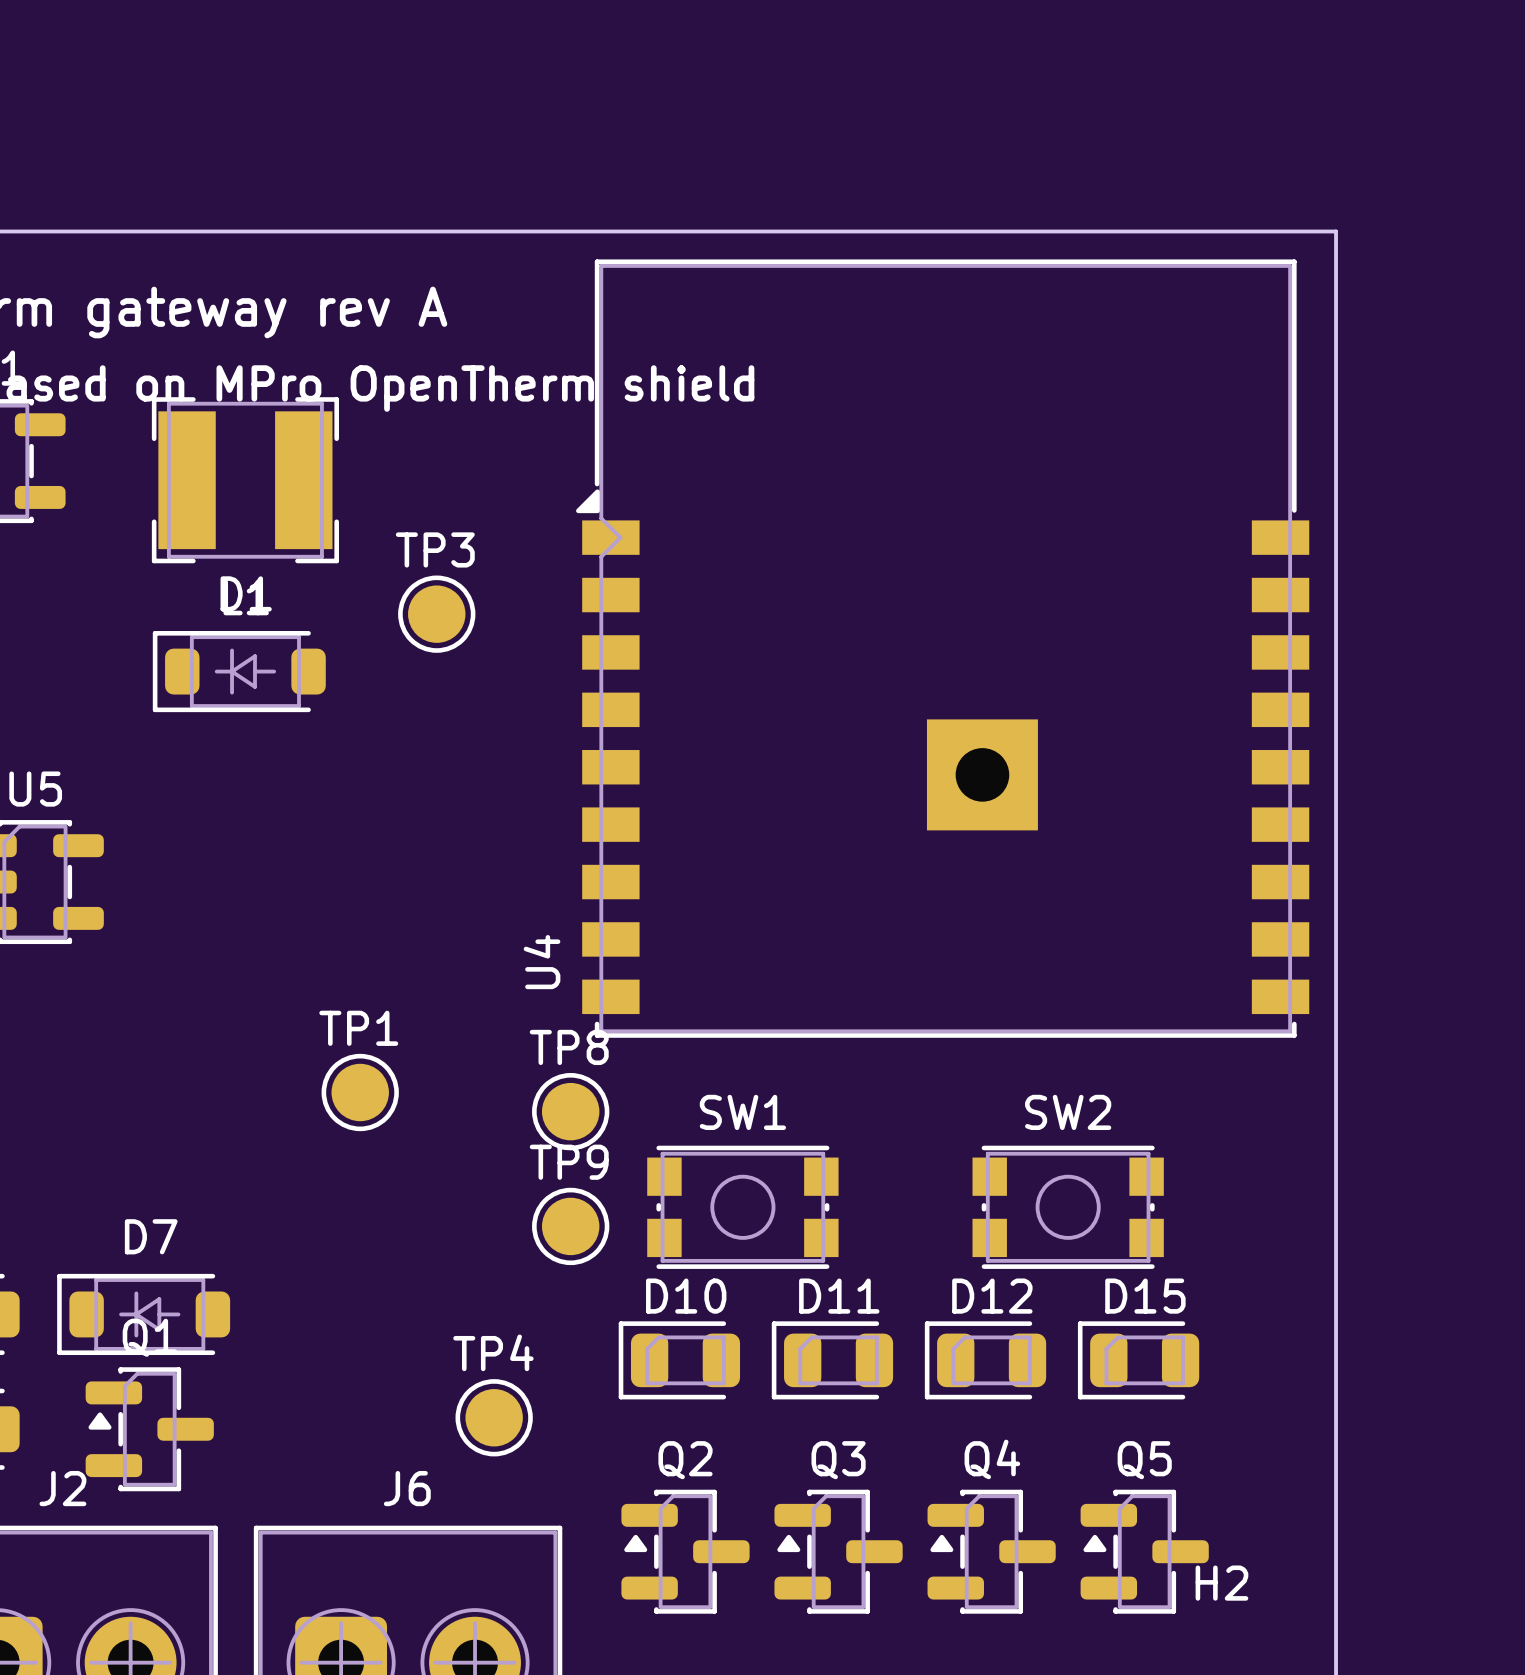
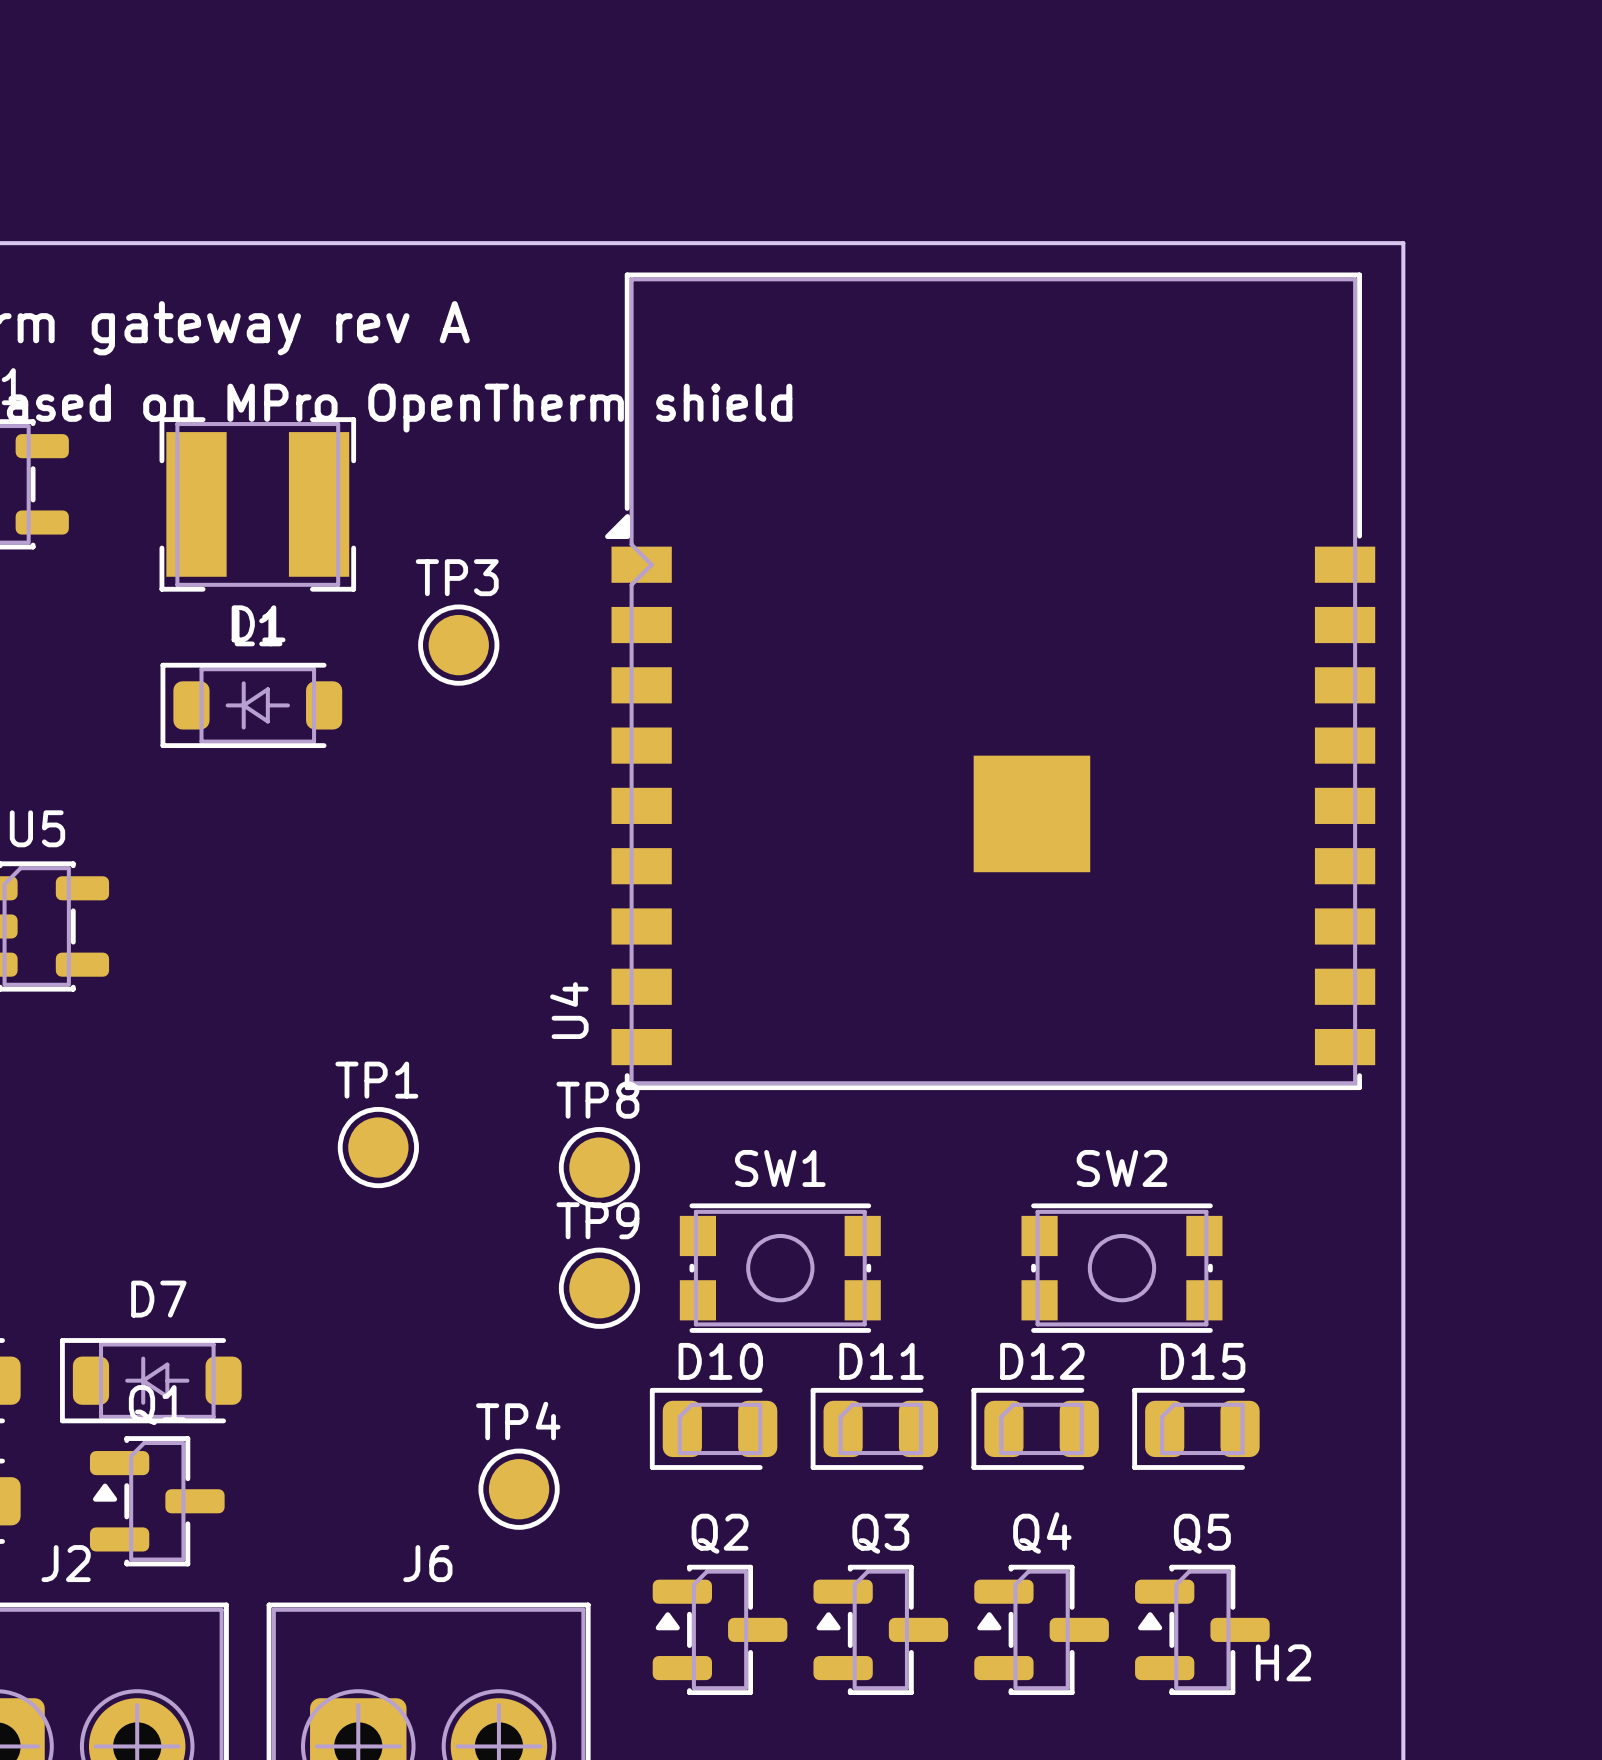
U4 footprint: [576, 259, 1310, 1038] -> [605, 272, 1376, 1091]

